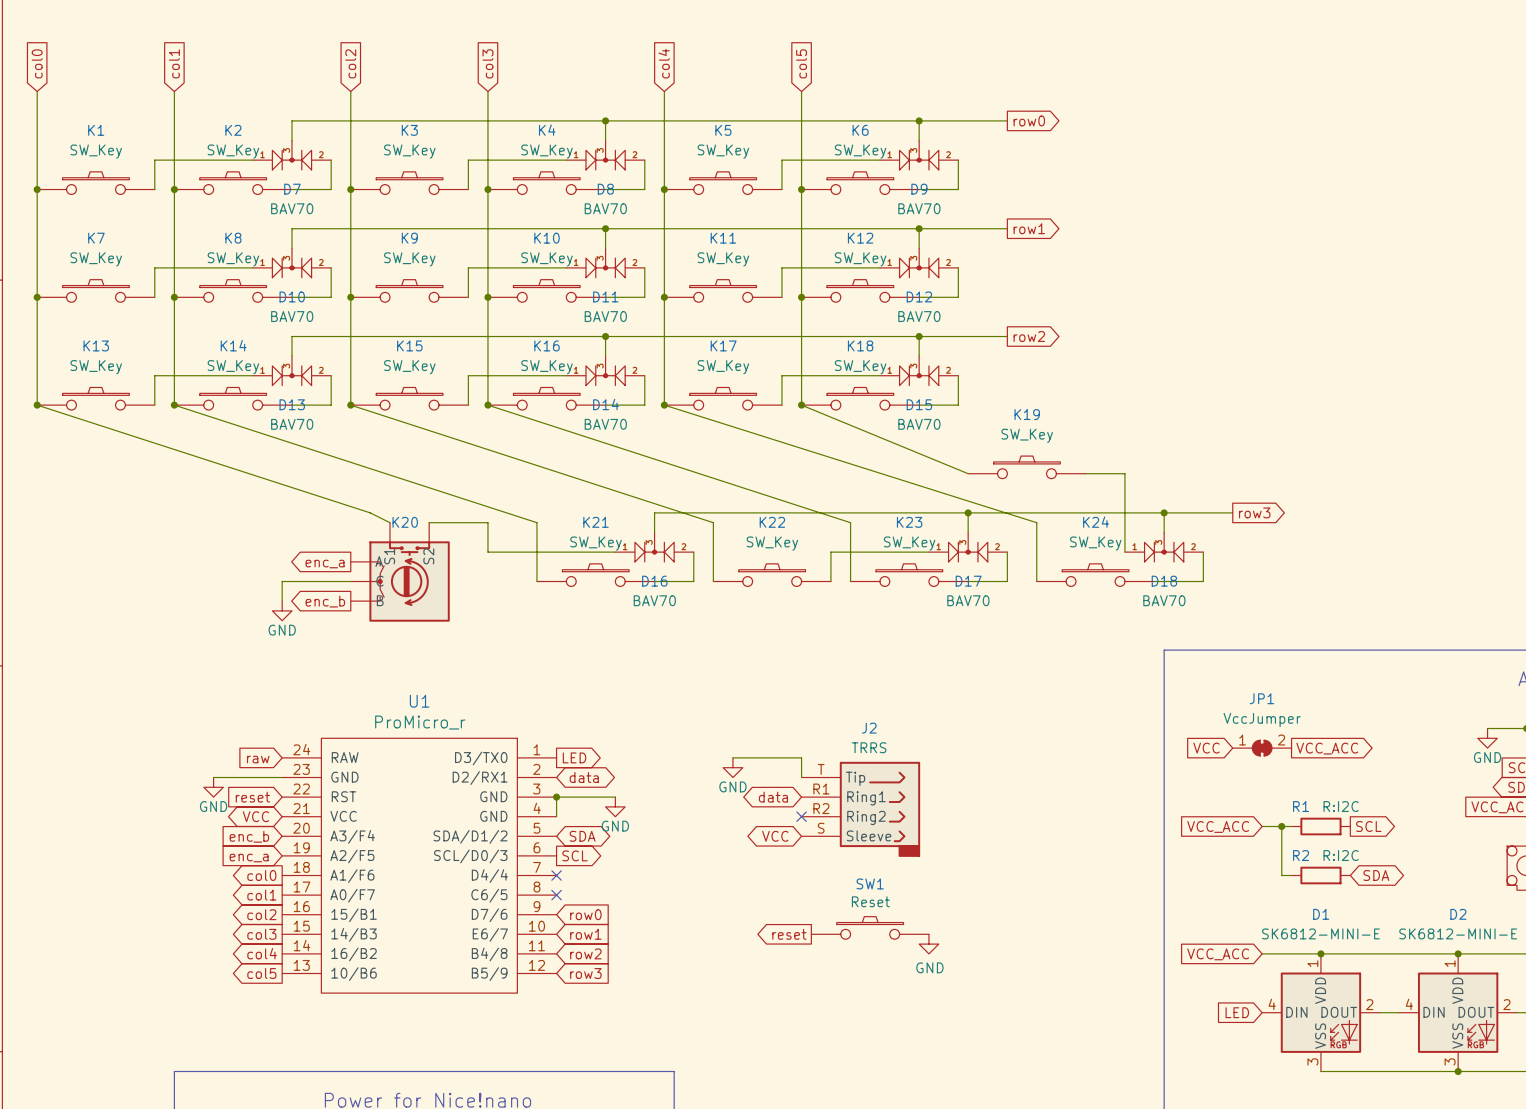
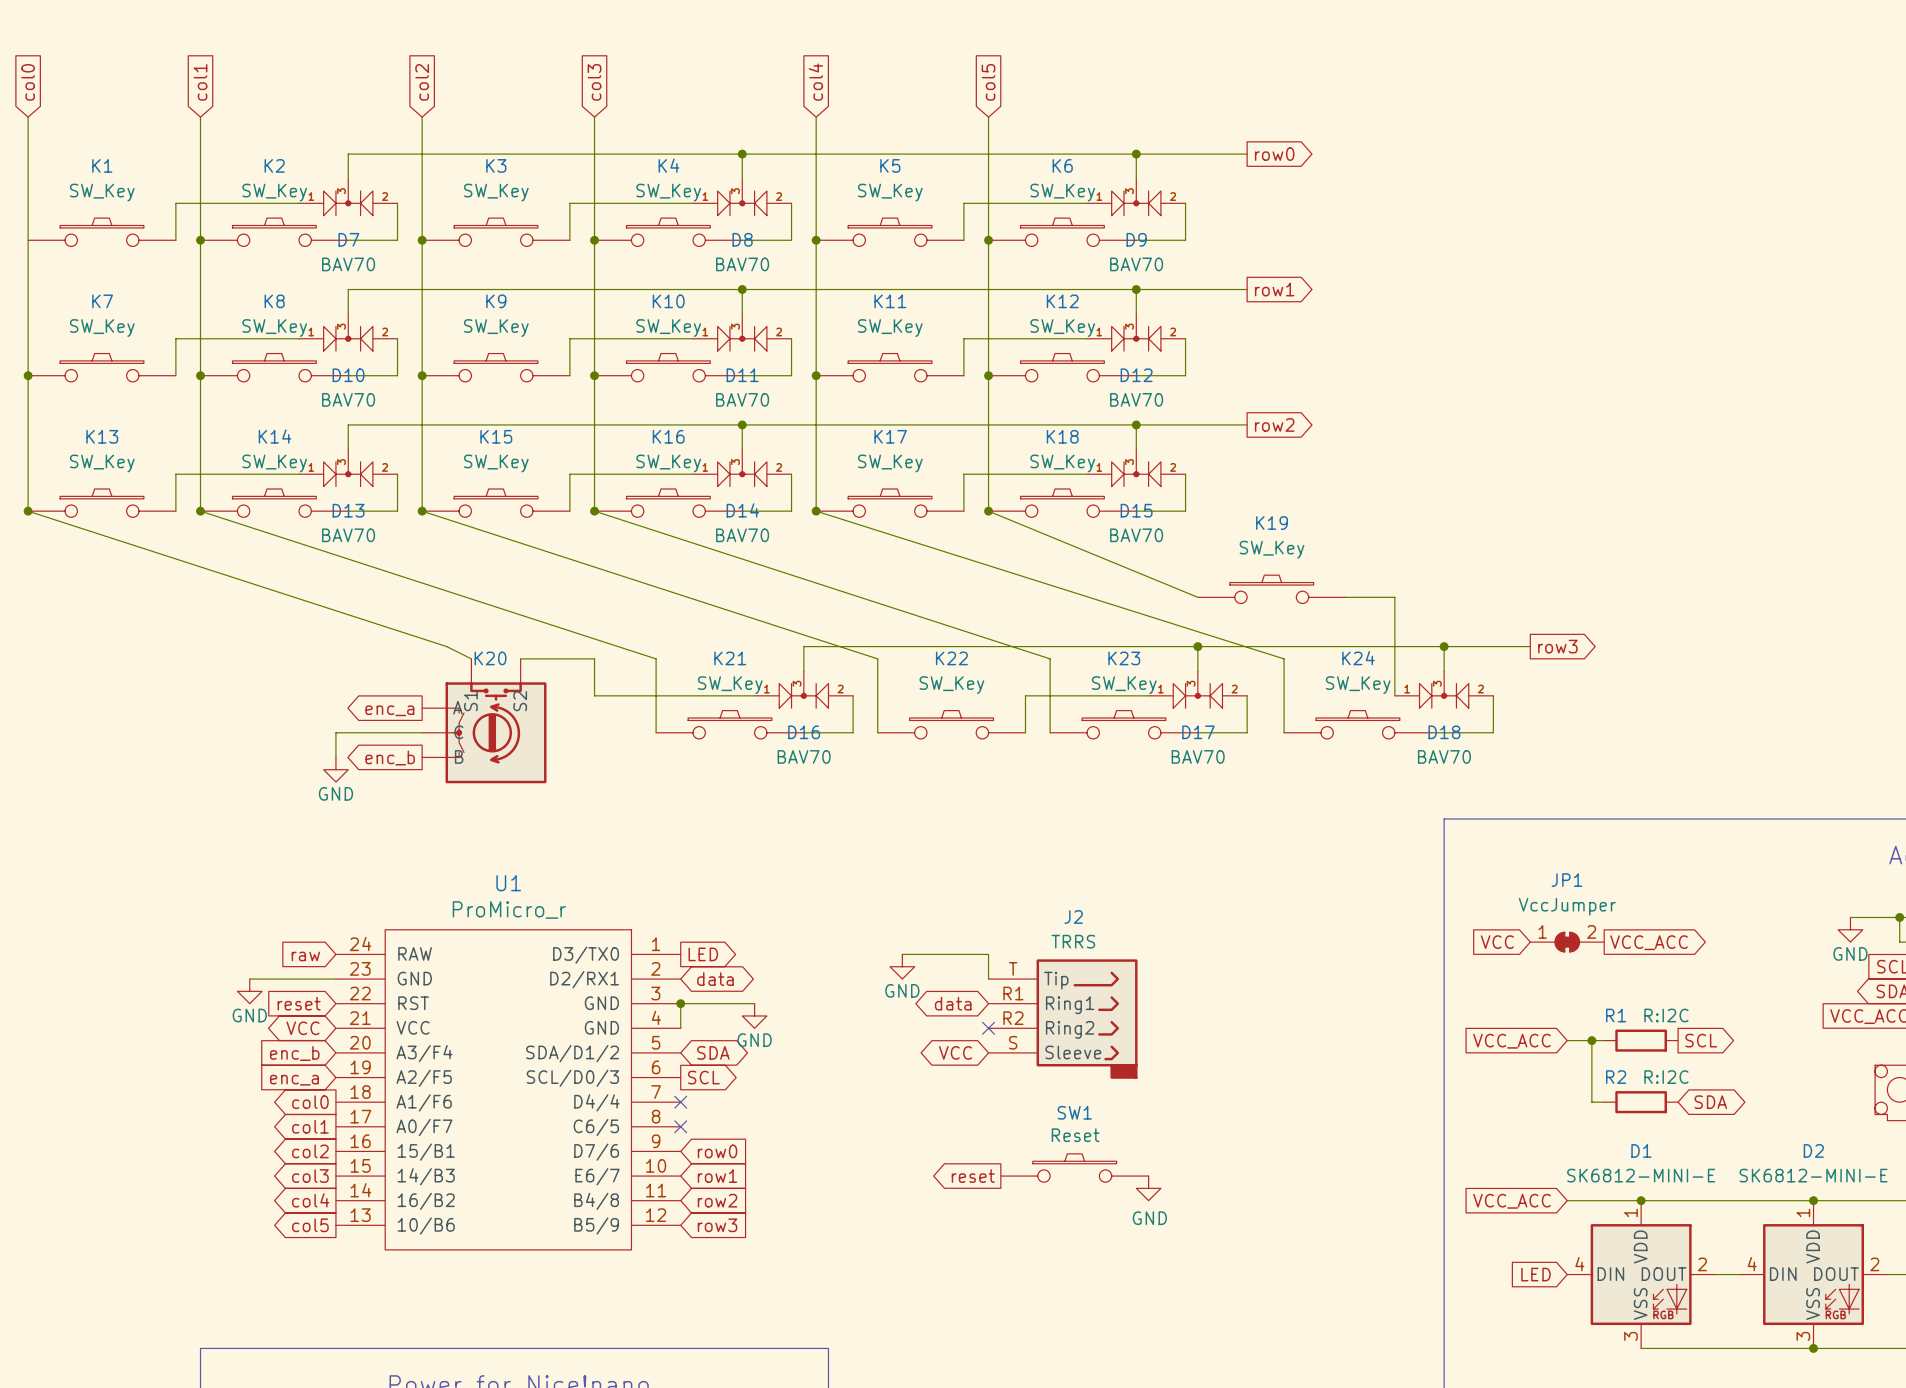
junction: (37, 189) -> none

